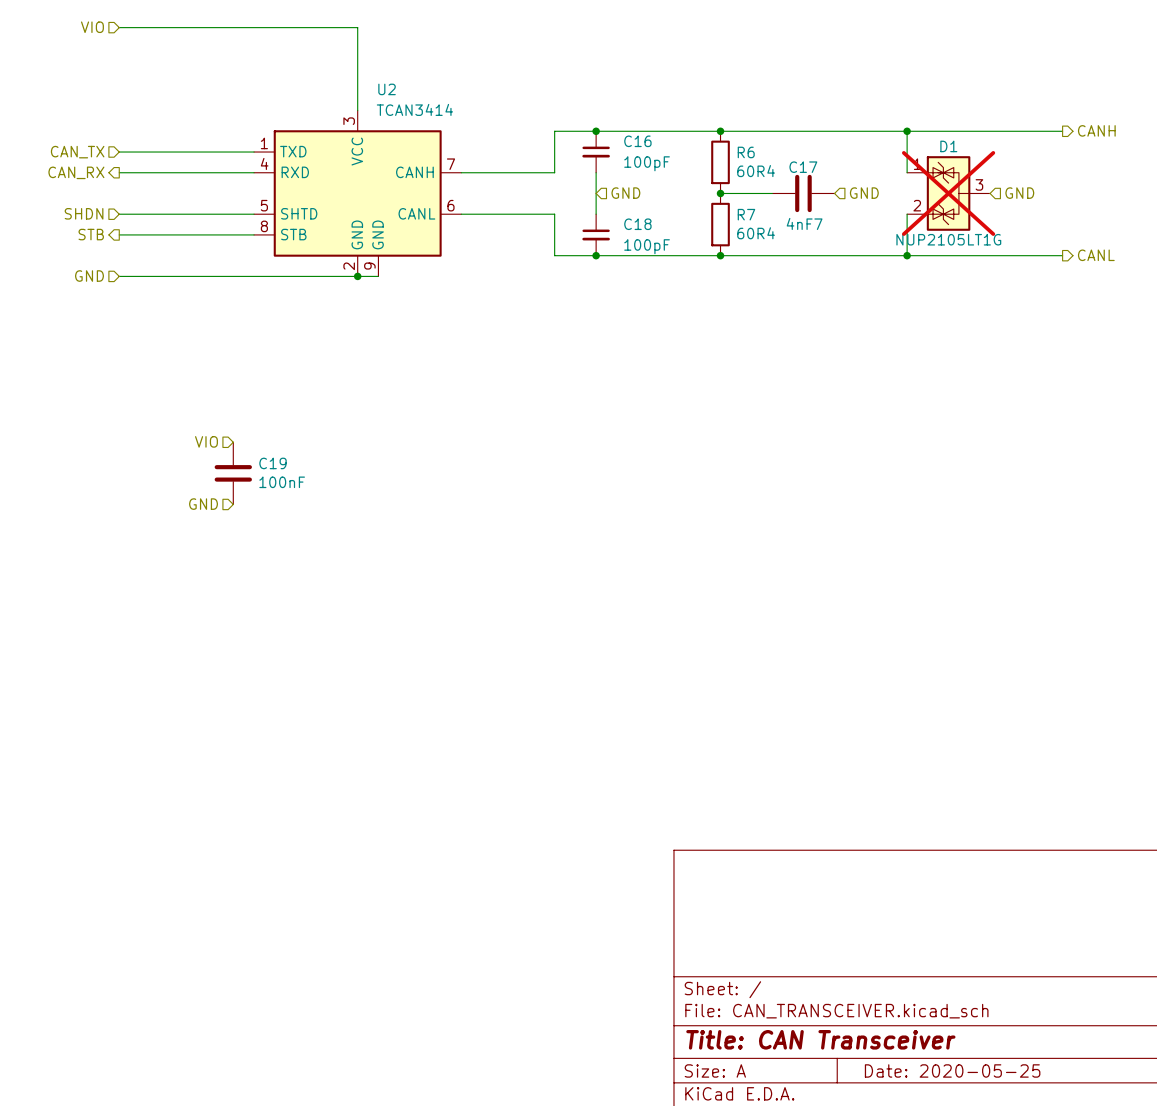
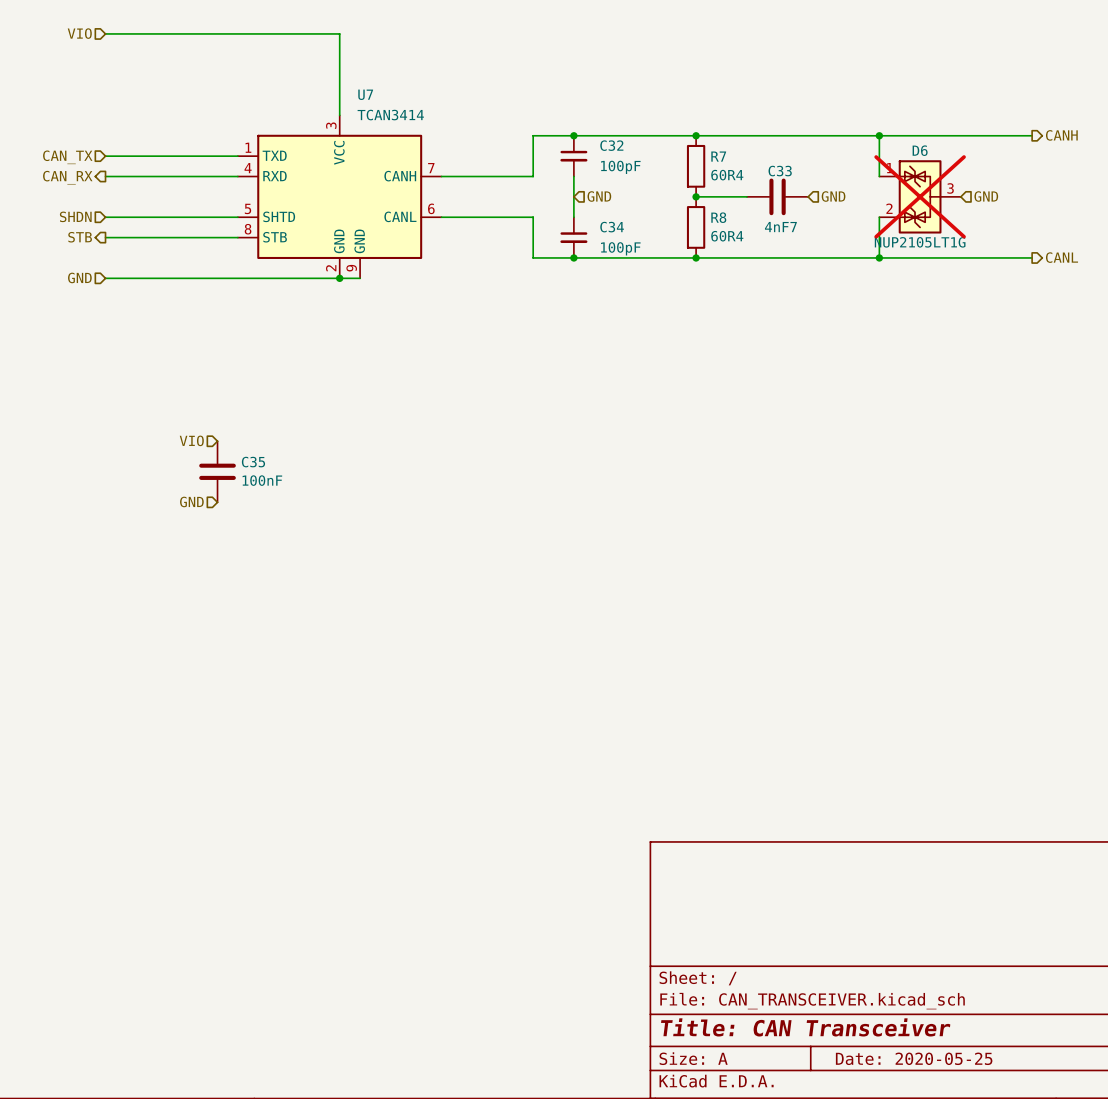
U2 name: U2 (387, 89) -> U7 (365, 94)
C16 name: C16 (637, 141) -> C32 (611, 145)
D1 name: D1 (948, 146) -> D6 (920, 150)
R6 name: R6 (746, 152) -> R7 (718, 156)
C17 name: C17 (803, 167) -> C33 (780, 171)
R7 name: R7 (746, 214) -> R8 (718, 217)
C18 name: C18 (637, 224) -> C34 (612, 227)
C19 name: C19 (273, 463) -> C35 (253, 462)

